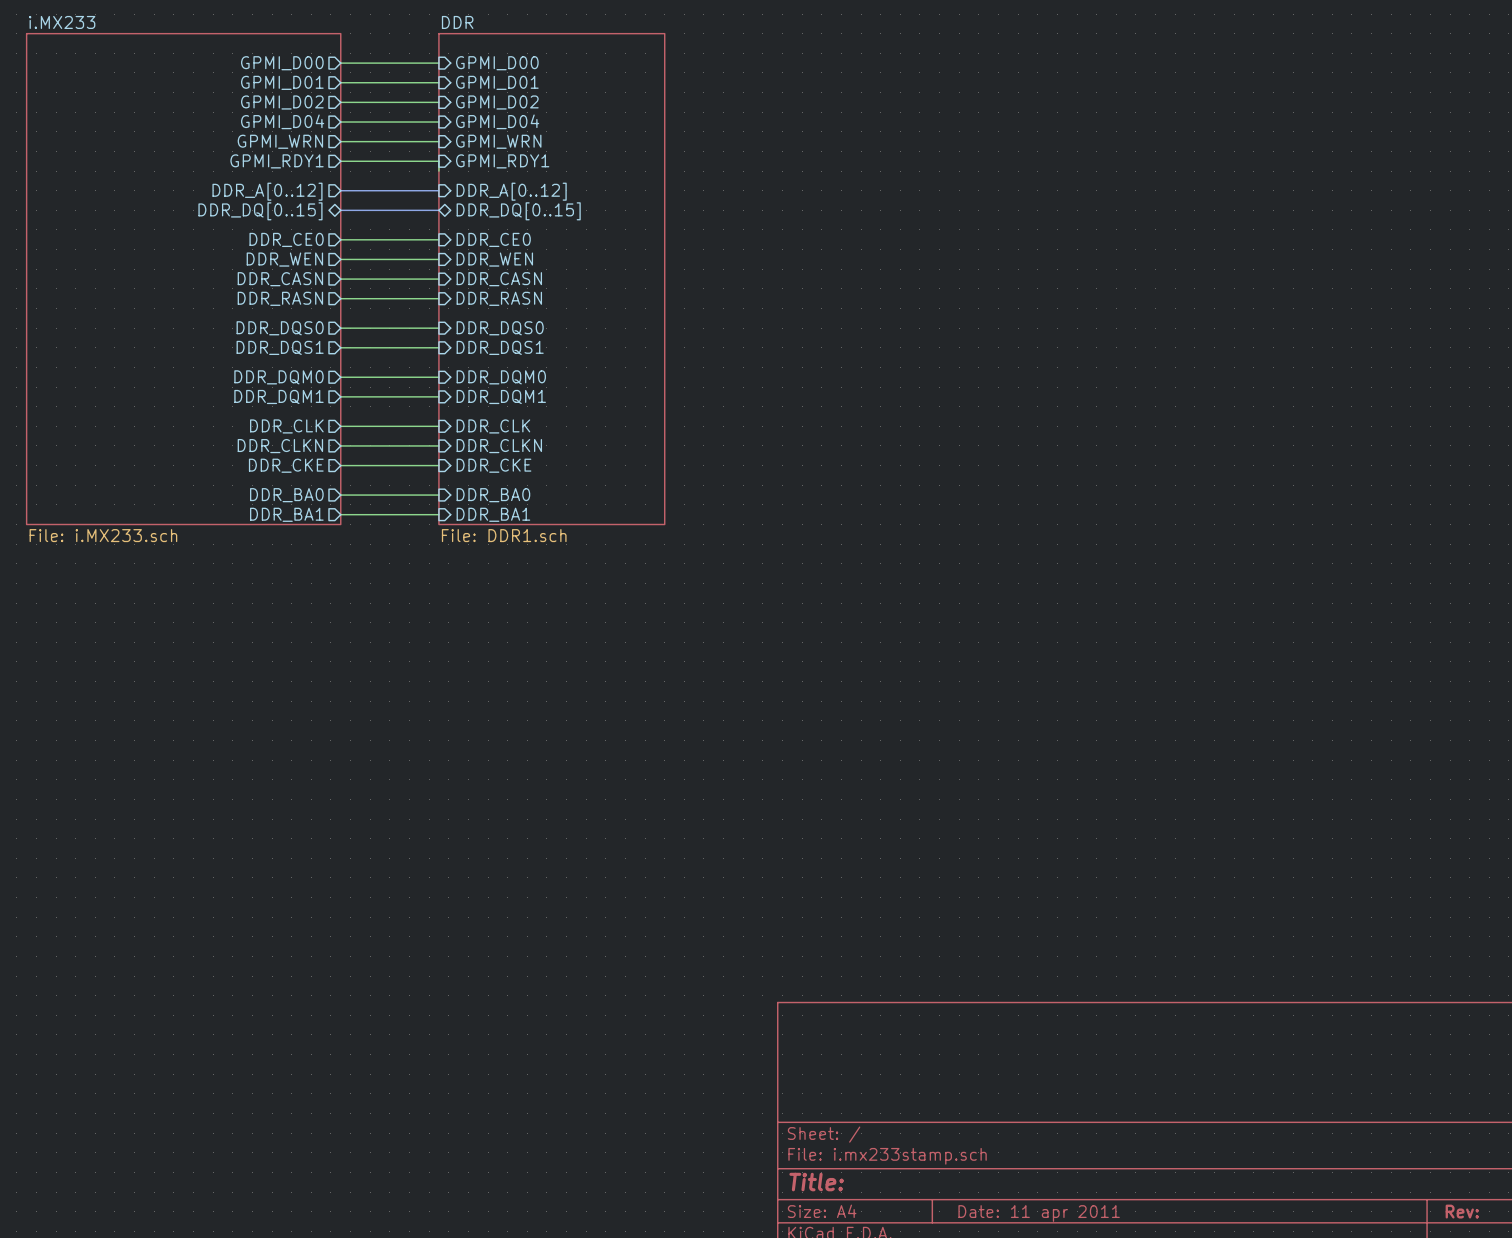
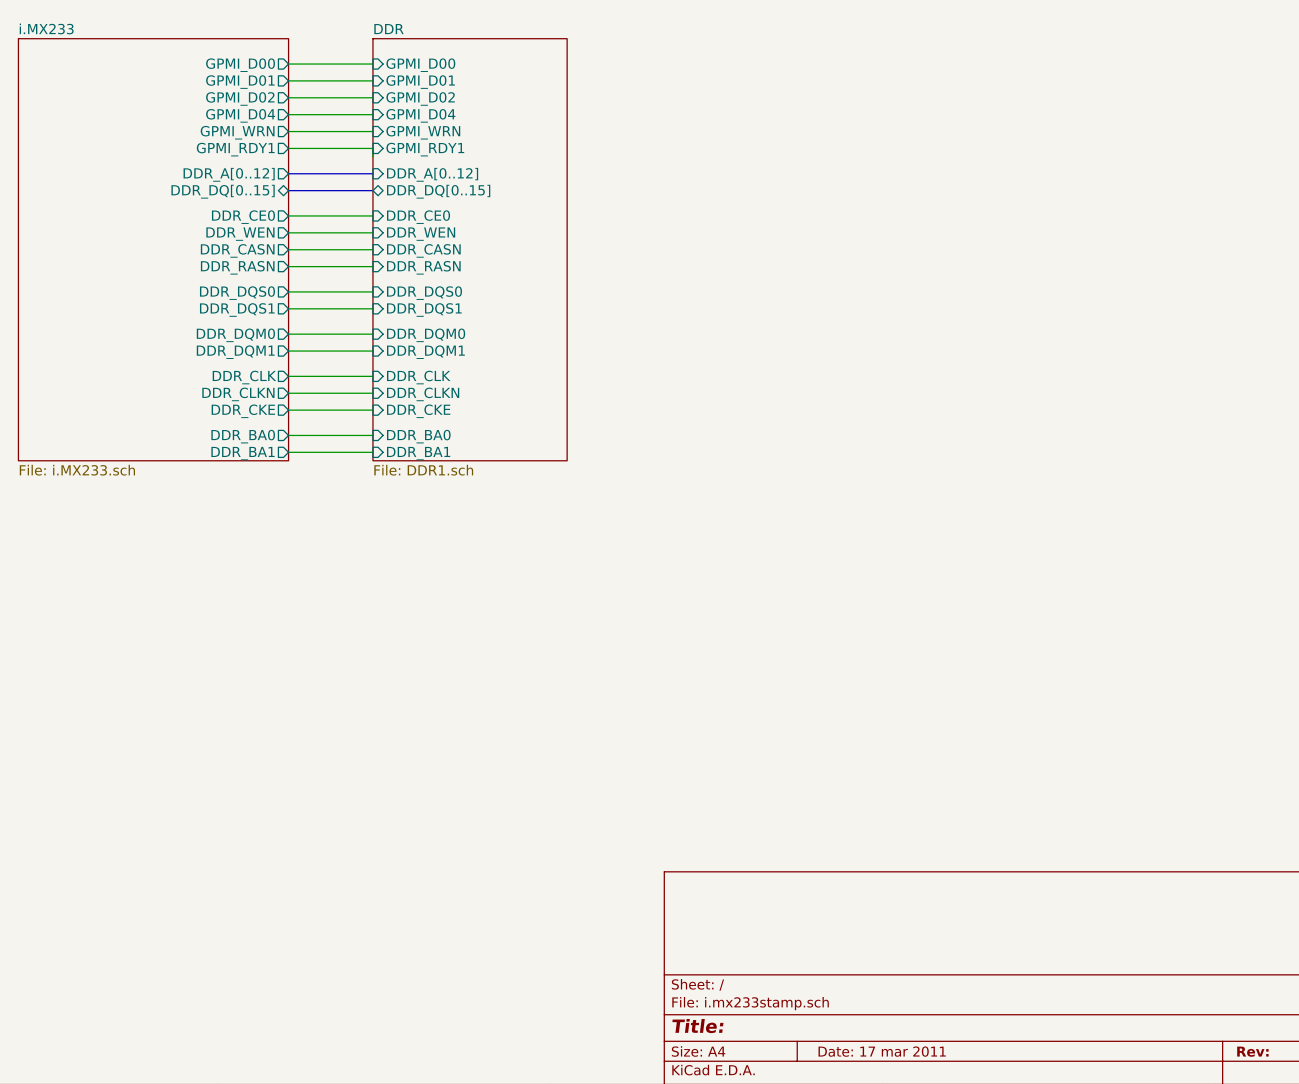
title block: Date: 11 apr 2011 (1039, 1213) -> Date: 17 mar 2011 (882, 1051)

